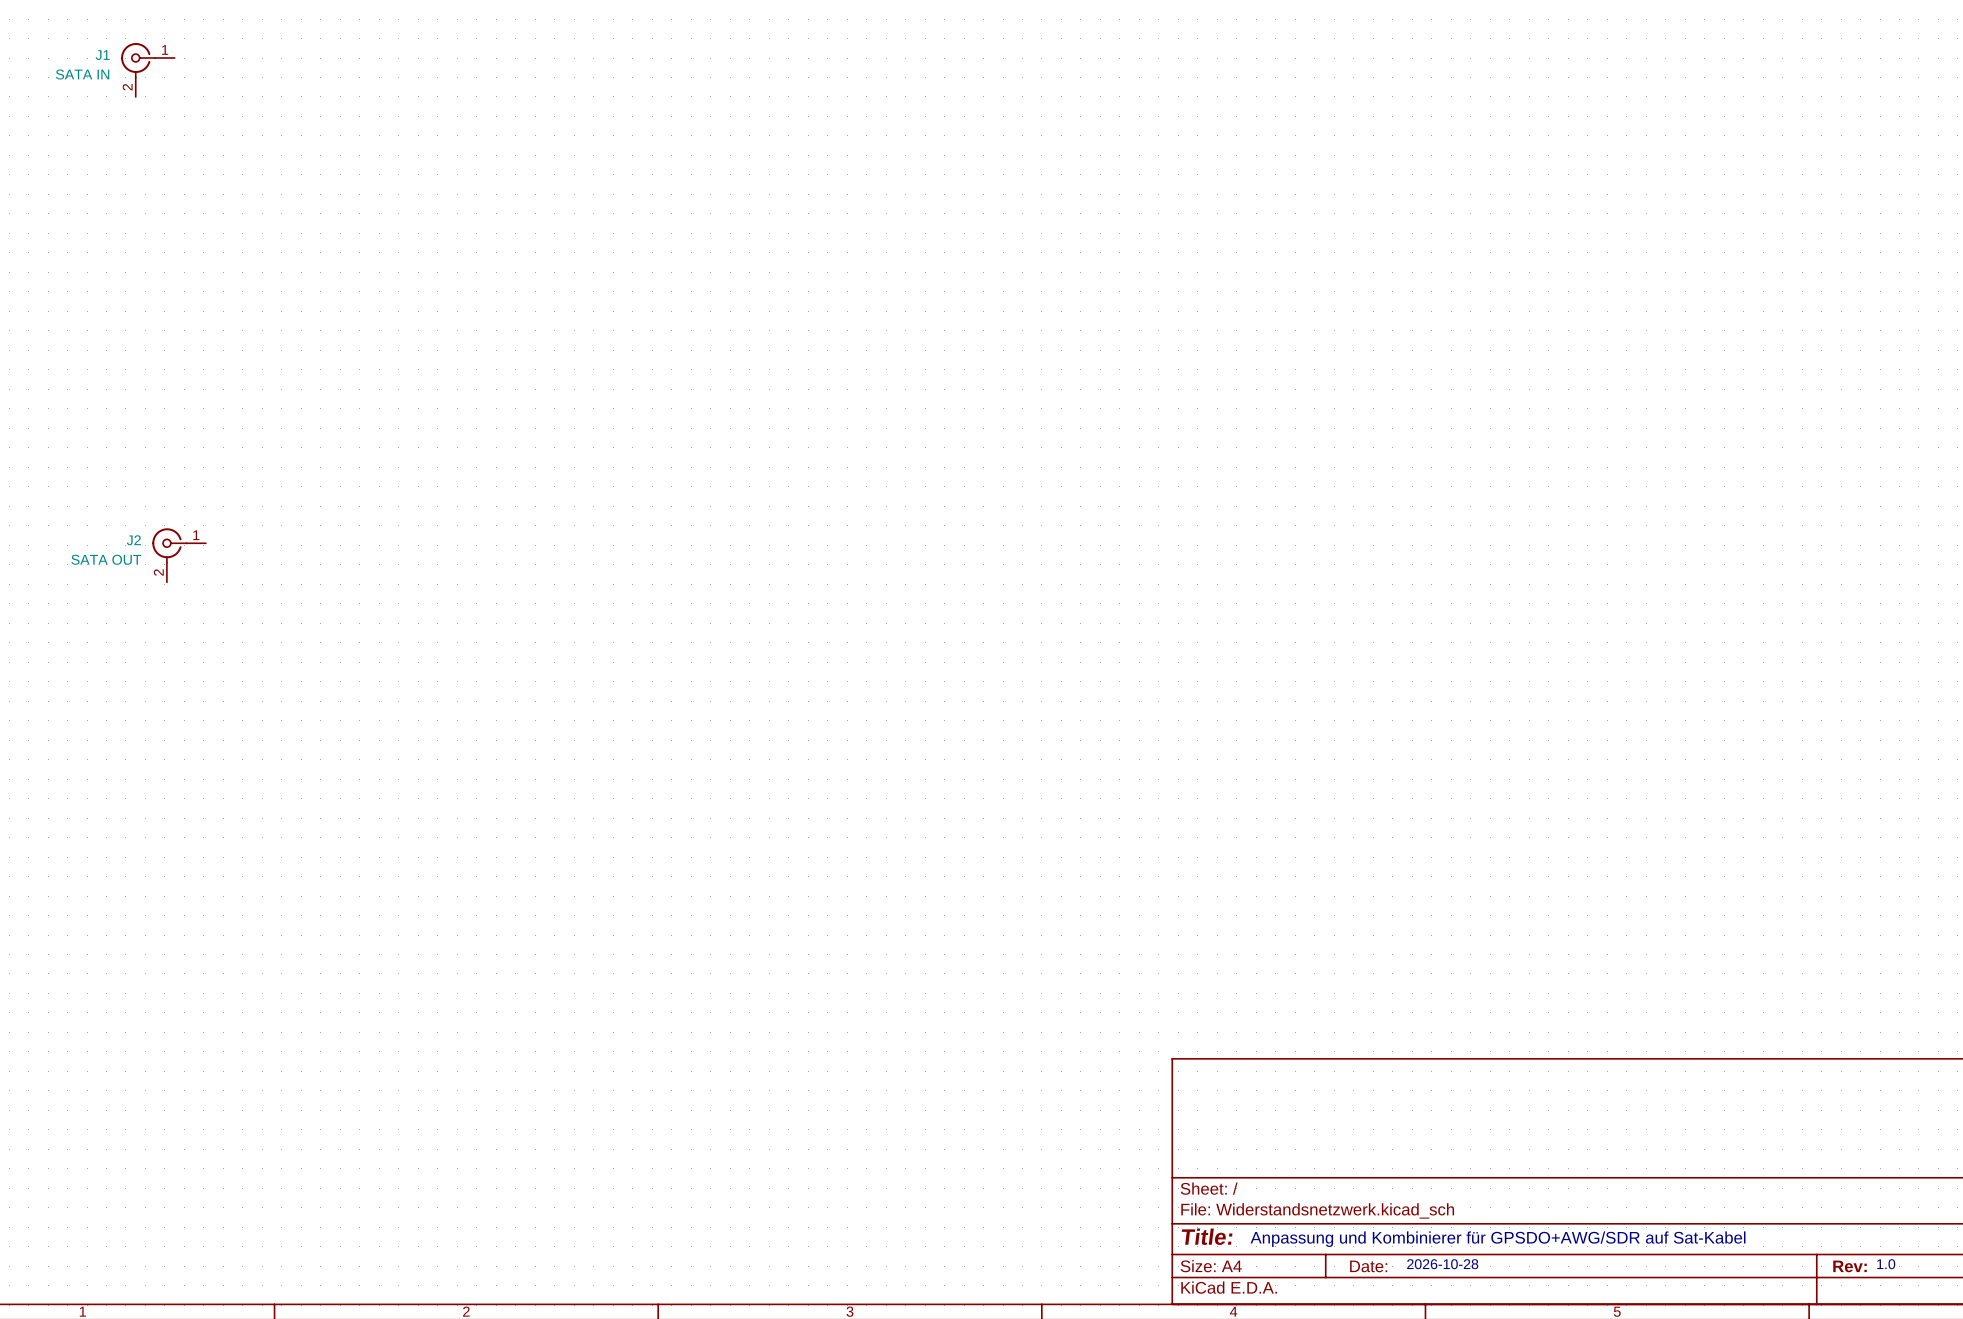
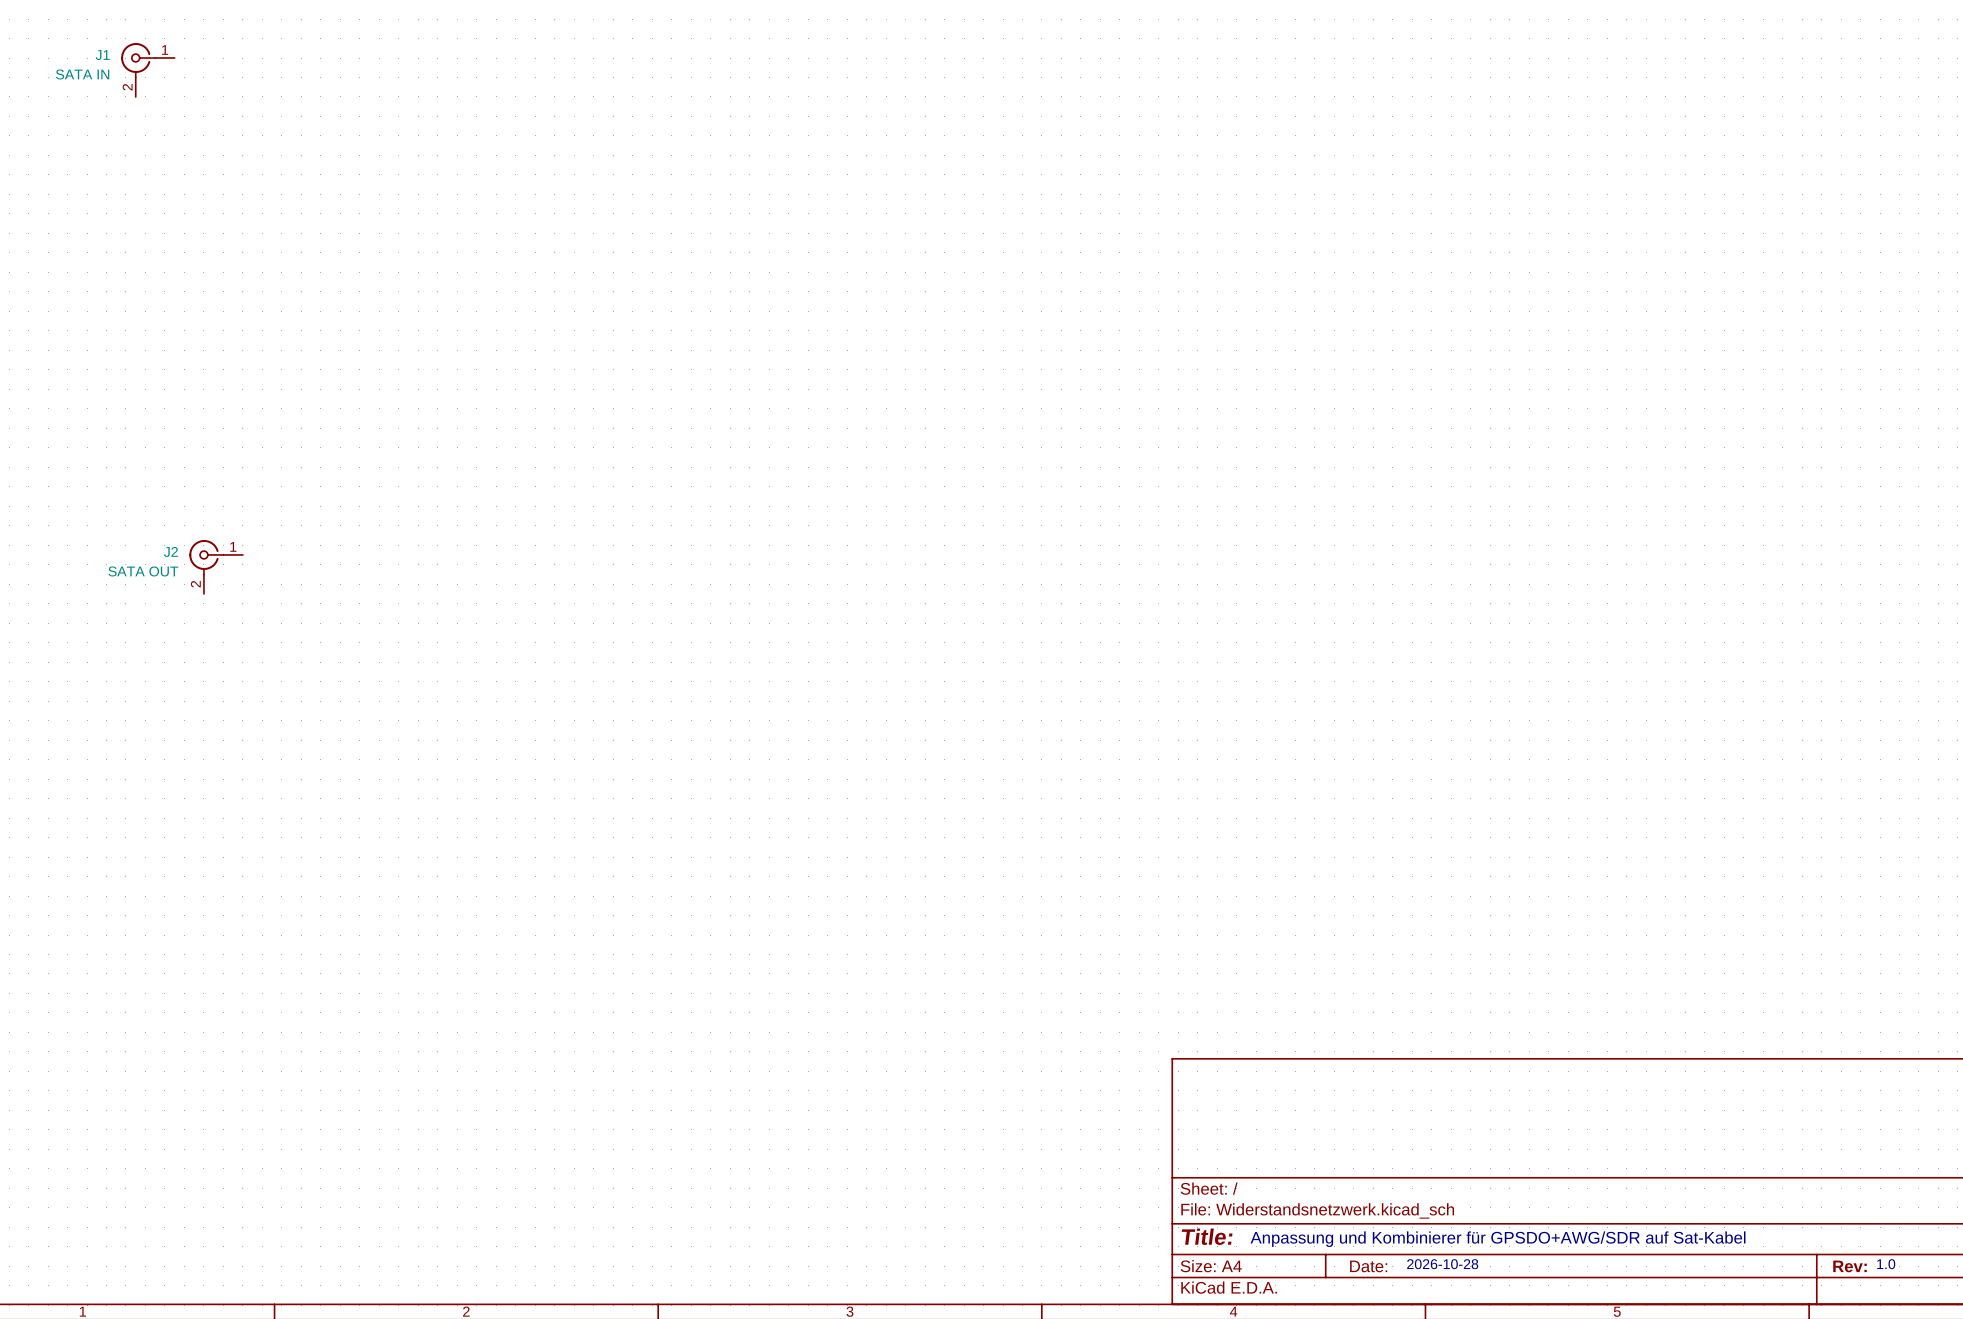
J2 position: (179, 555) -> (216, 566)

